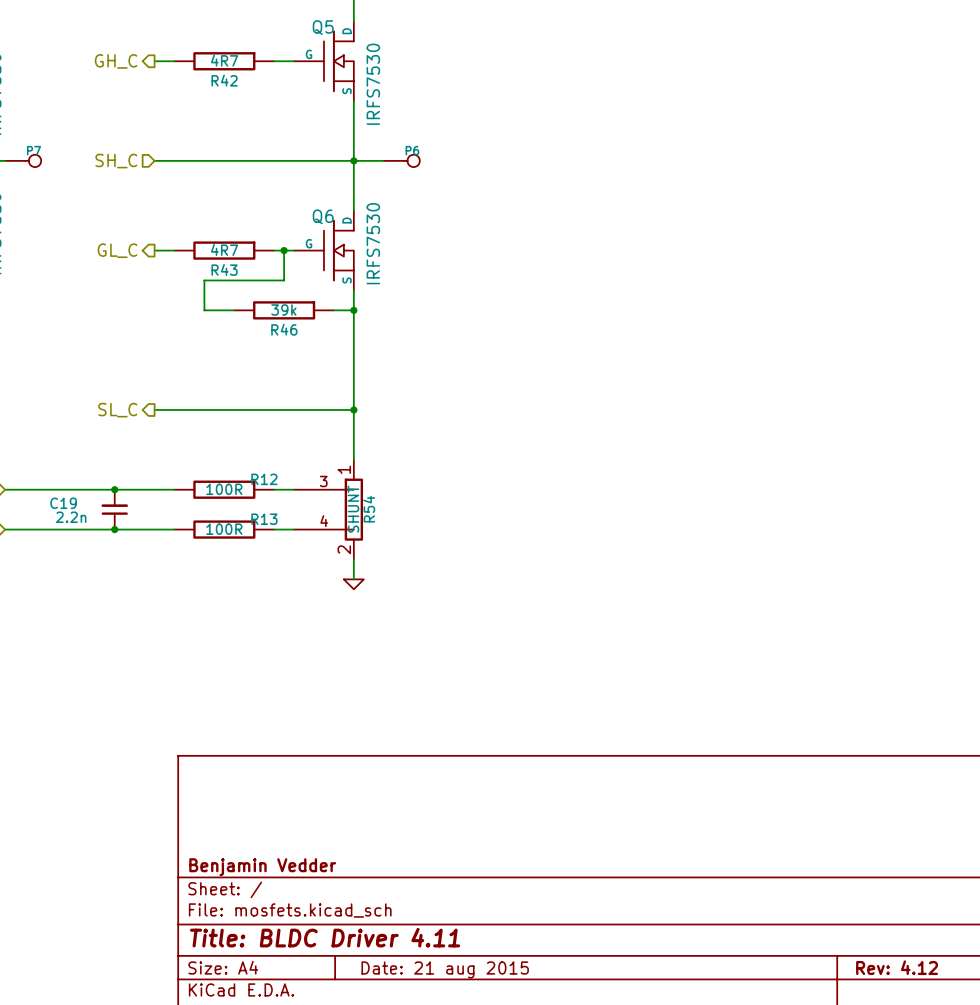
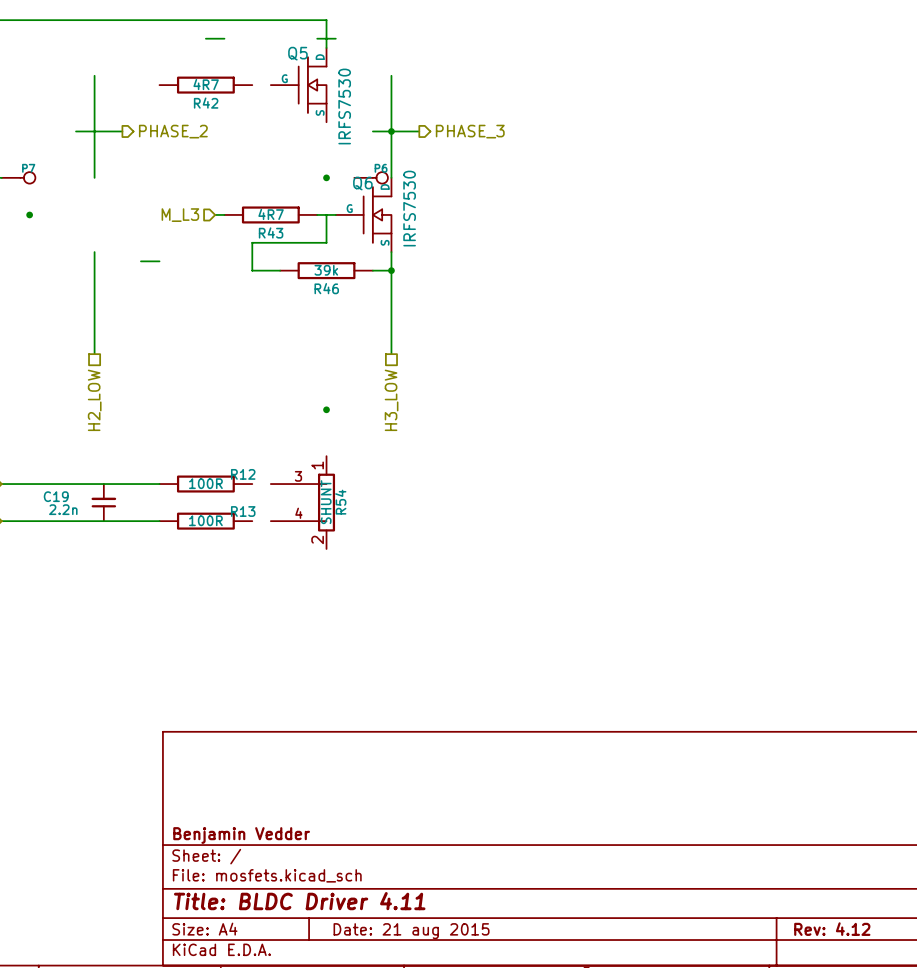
wire: none -> (94, 75) (94, 177)
wire: none -> (391, 75) (391, 177)
hierarchical label: GH_C (116, 61) -> none
wire: (154, 61) (174, 61) -> (205, 38) (224, 38)
wire: (274, 61) (294, 61) -> (317, 38) (335, 38)
wire: (353, 101) (353, 200) -> none
wire: none -> (76, 131) (122, 131)
hierarchical label: none -> PHASE_2 (173, 131)
wire: none -> (372, 131) (419, 131)
junction: none -> (391, 131)
hierarchical label: none -> PHASE_3 (470, 131)
wire: (154, 160) (383, 160) -> none
hierarchical label: SH_C (116, 161) -> none
junction: none -> (29, 214)
hierarchical label: none -> M_L3 (180, 215)
wire: none -> (215, 214) (224, 214)
wire: none -> (326, 224) (326, 242) (252, 242) (252, 270) (280, 270)
wire: none -> (94, 252) (94, 354)
wire: none -> (391, 252) (391, 354)
hierarchical label: GL_C (117, 250) -> none
R43 position: (224, 250) -> (270, 214)
wire: (274, 250) (294, 250) -> (317, 214) (335, 214)
wire: (284, 250) (284, 280) (204, 280) (204, 310) (234, 310) -> none
junction: (284, 250) -> none
Q6 position: (324, 250) -> (363, 214)
junction: none -> (391, 270)
wire: (353, 290) (353, 459) -> none
R46 position: (284, 310) -> (326, 270)
wire: (333, 310) (353, 310) -> (372, 270) (391, 270)
junction: (353, 310) -> none
hierarchical label: none -> H2_LOW (94, 400)
hierarchical label: none -> H3_LOW (391, 400)
hierarchical label: SL_C (117, 410) -> none
wire: (154, 410) (353, 410) -> none
junction: (114, 489) -> none
wire: (274, 489) (294, 489) -> none
junction: (114, 529) -> none
wire: (274, 529) (294, 529) -> none
wire: (353, 559) (353, 579) -> none
power symbol: (353, 584) -> none

